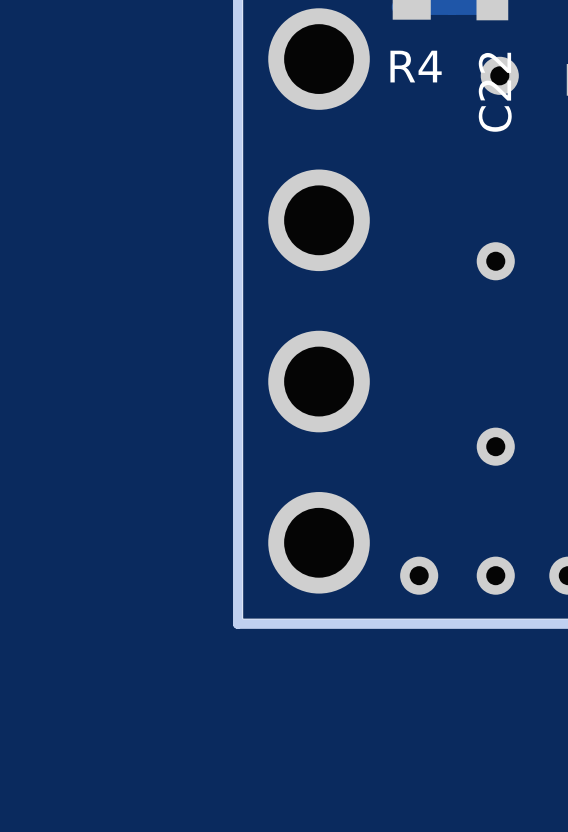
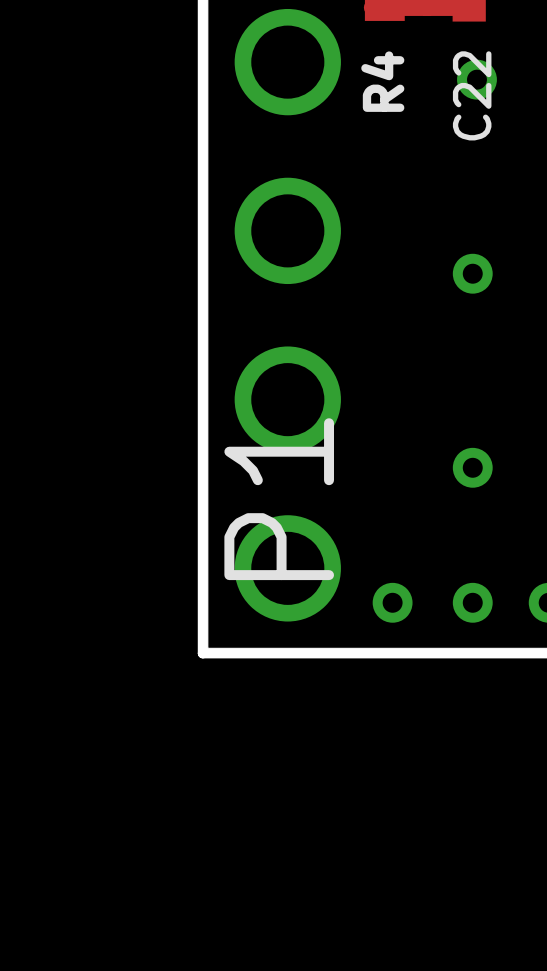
R4 name rotation: 0° (416, 66) -> 90° counterclockwise (382, 81)
P1 name: none -> P1 (279, 499)

